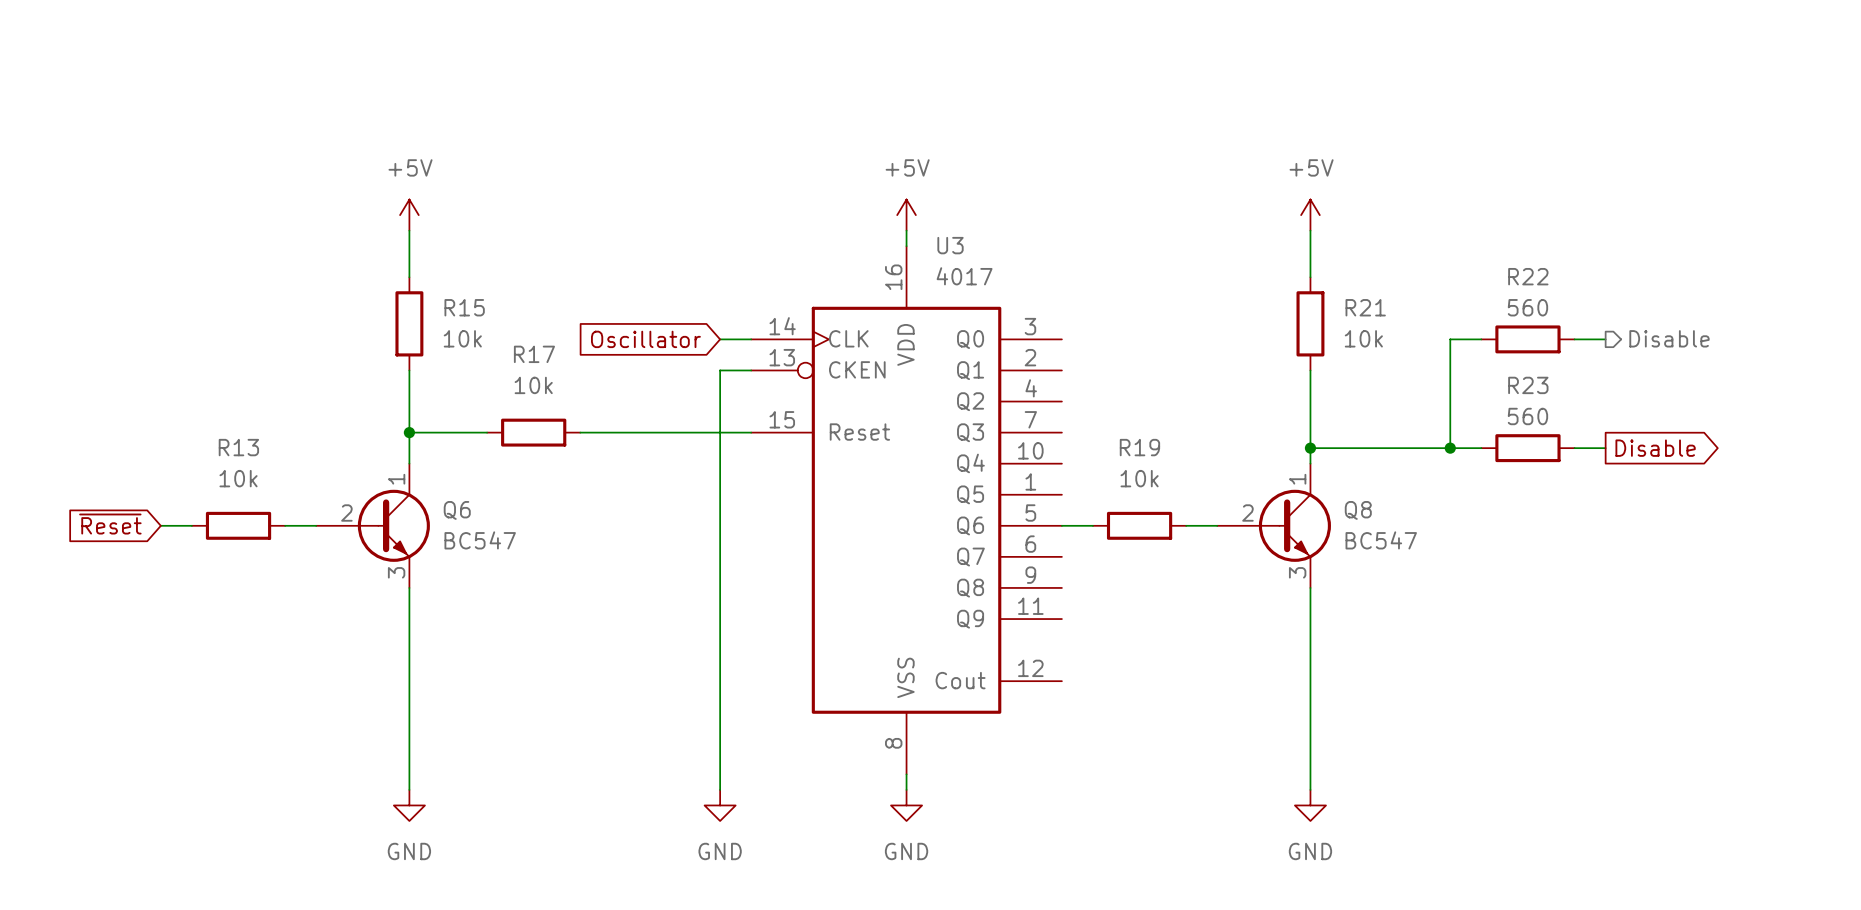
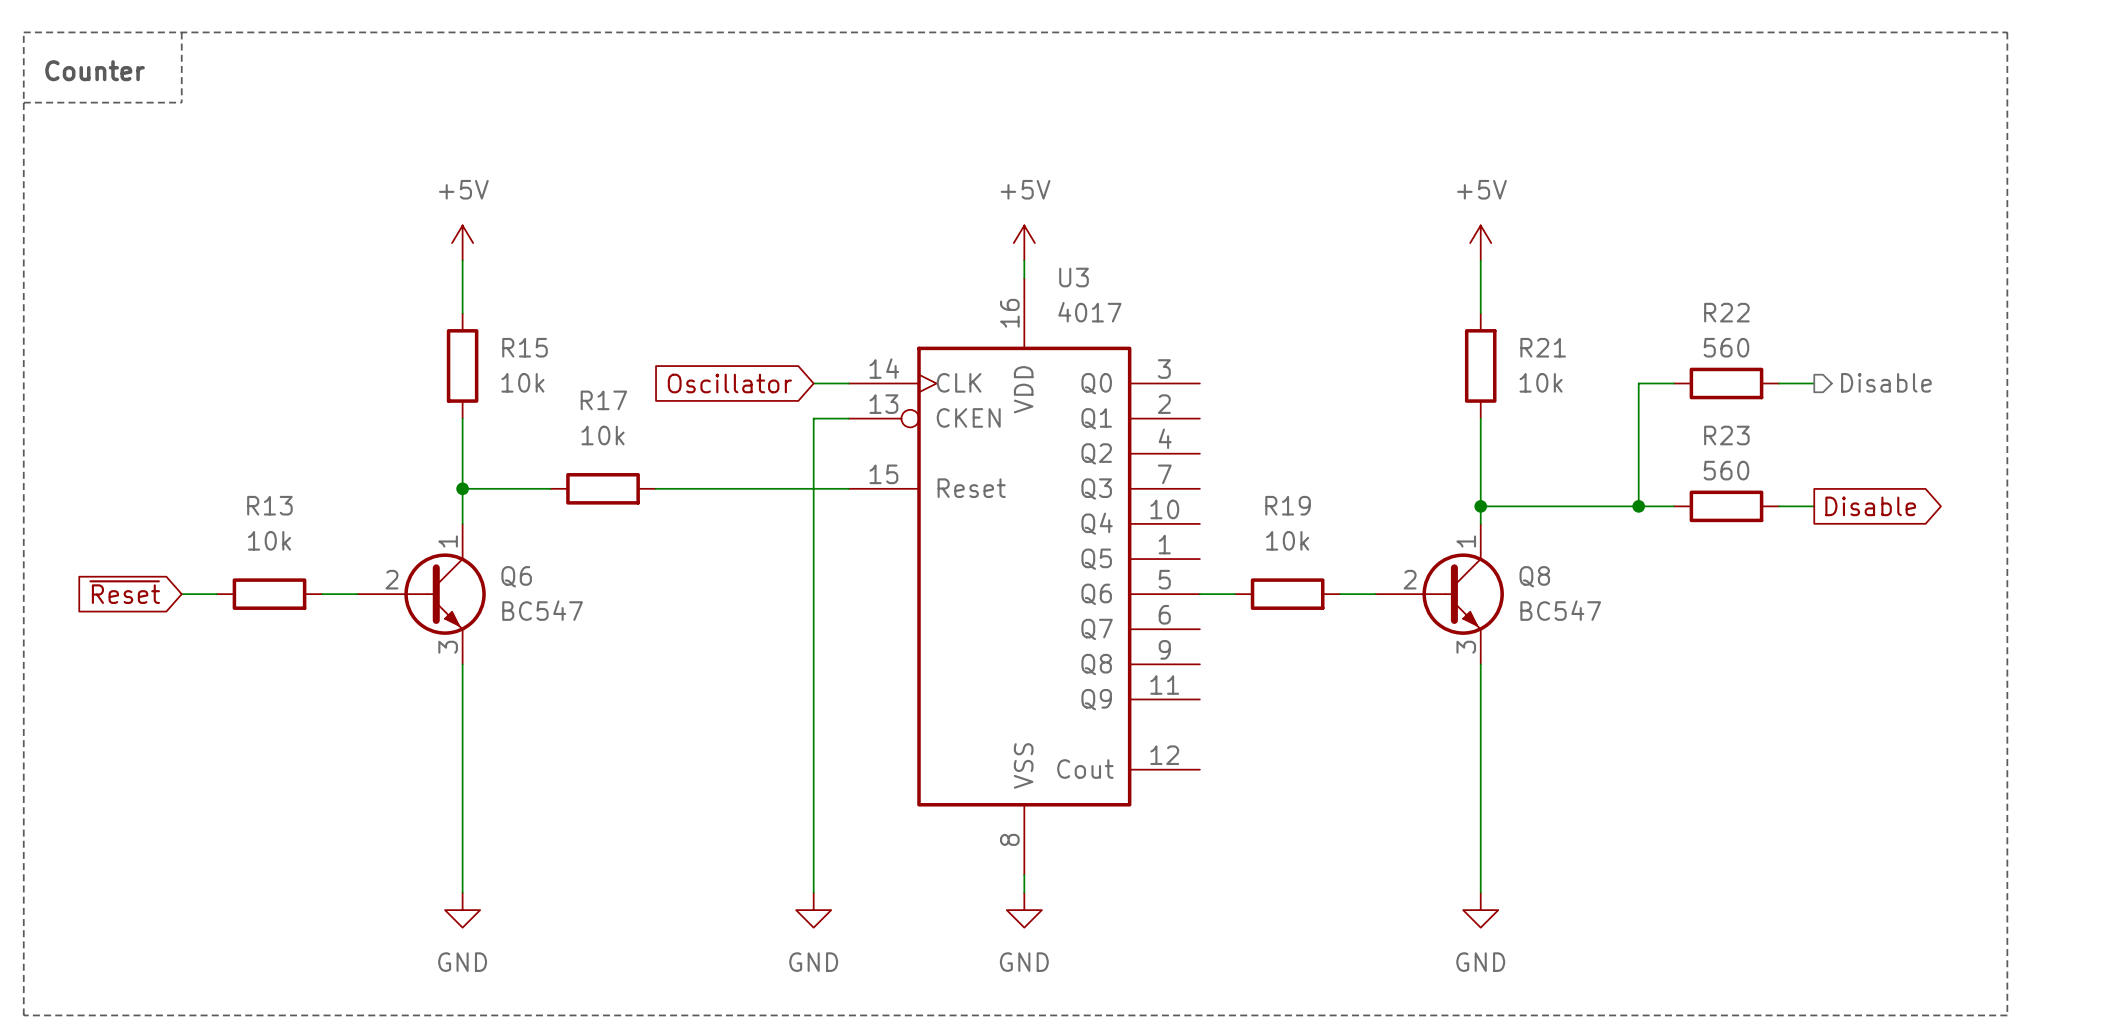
line: none -> (23, 32) (2007, 32) (2007, 1015) (23, 1015) (23, 32)
line: none -> (181, 32) (181, 102) (23, 102)
text: none -> Counter (95, 70)

